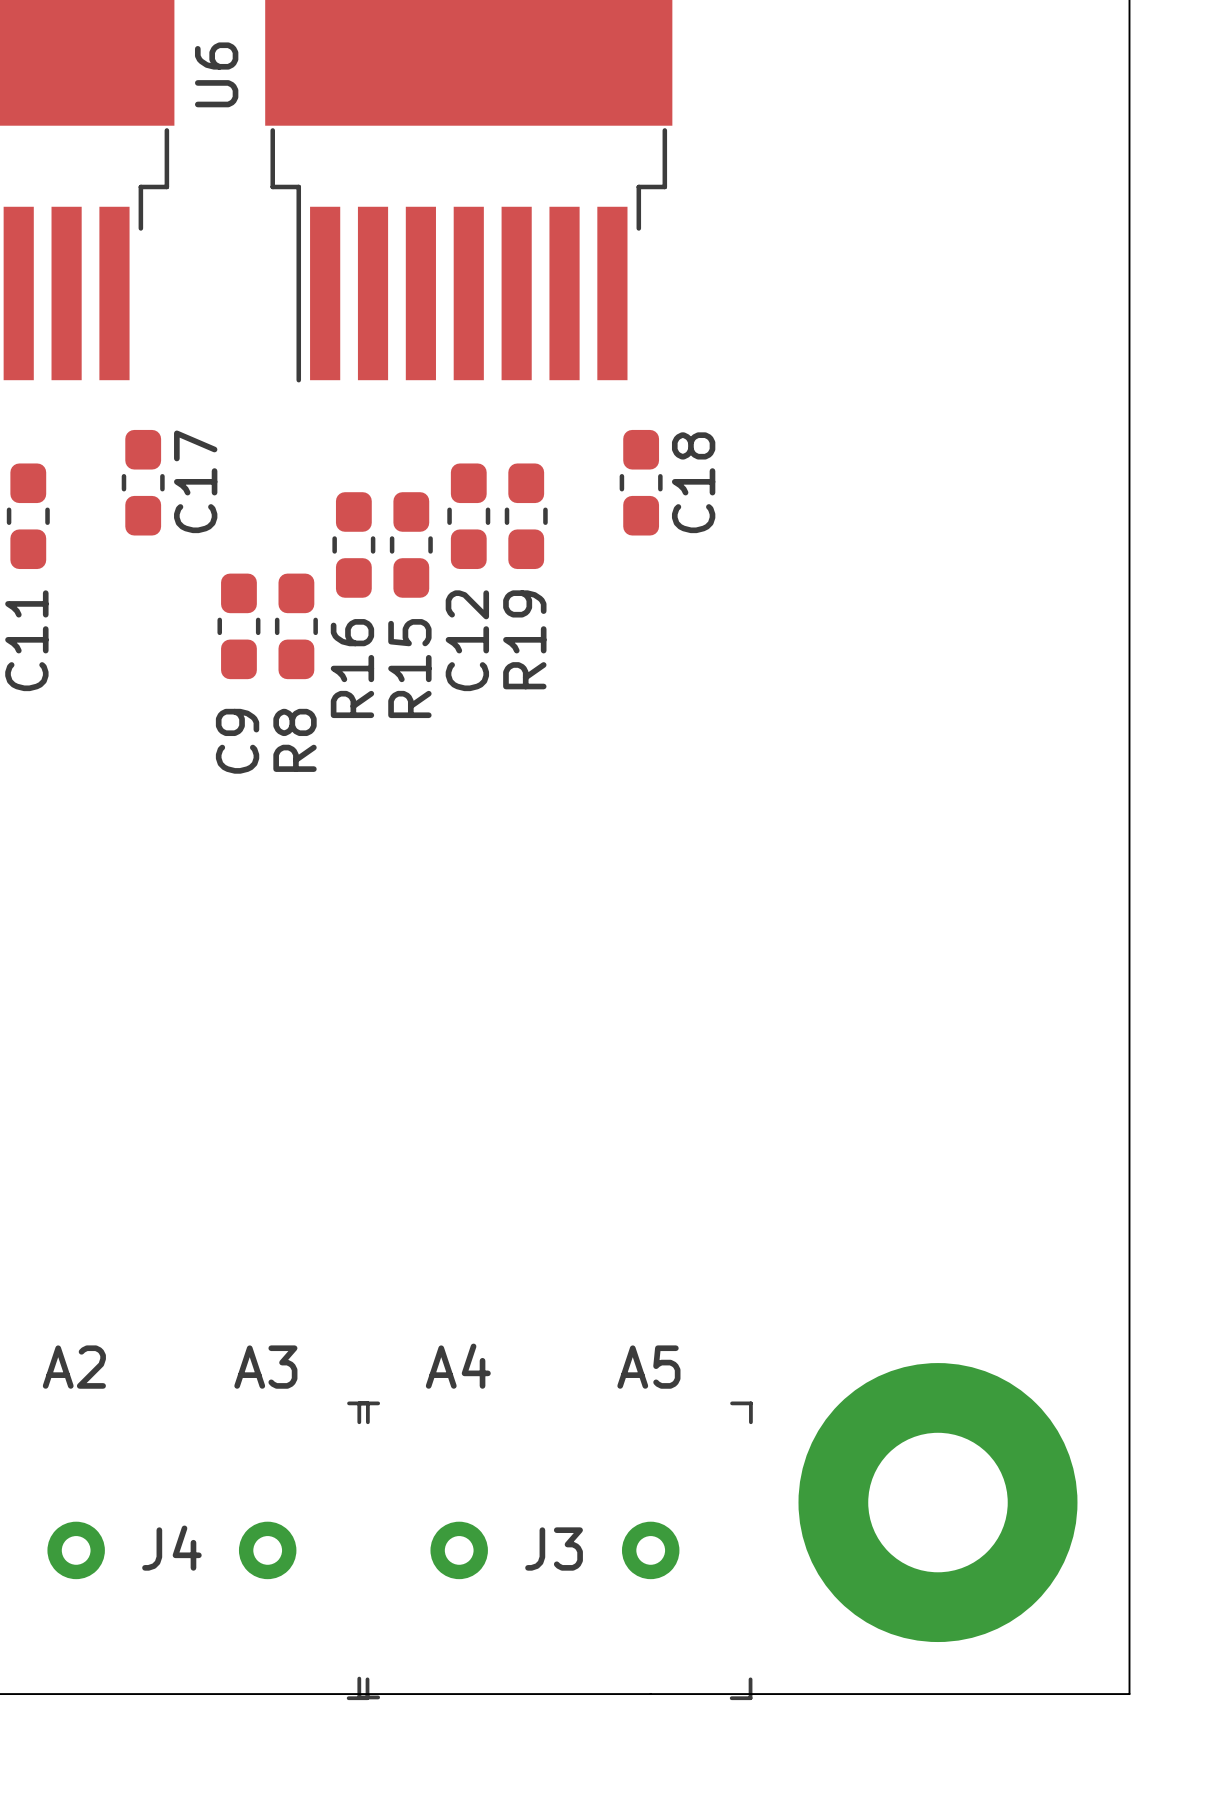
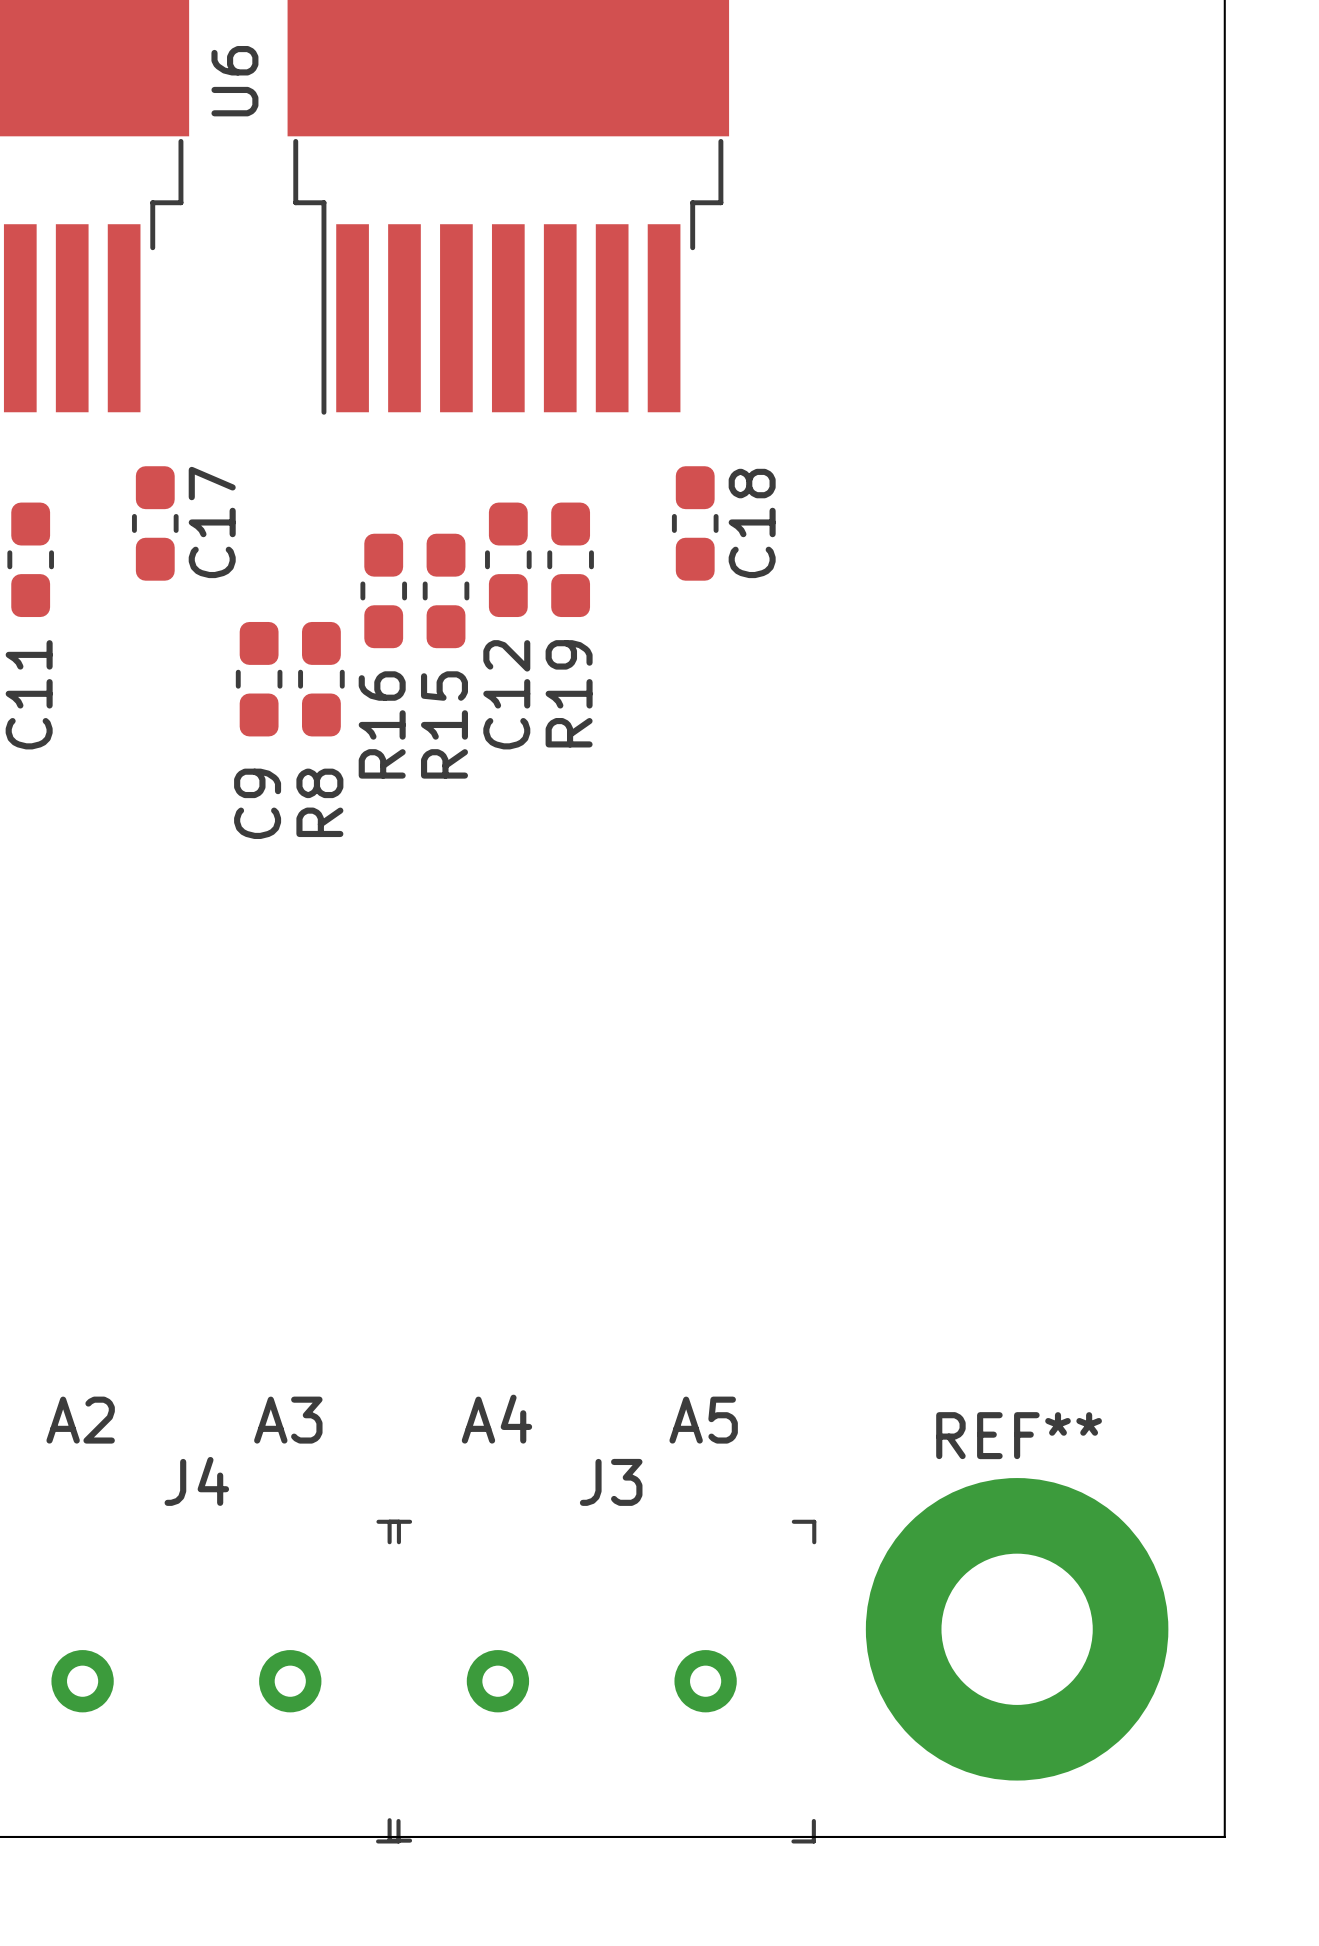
REF** name: none -> REF** (1019, 1435)
text position: A4 (458, 1366) -> A4 (496, 1419)
text position: A2 (74, 1367) -> A2 (80, 1420)
text position: A3 (265, 1367) -> A3 (288, 1420)
text position: A5 (648, 1367) -> A5 (703, 1420)
J4 name position: J4 (171, 1548) -> J4 (196, 1481)
J3 name position: J3 (554, 1549) -> J3 (611, 1482)

